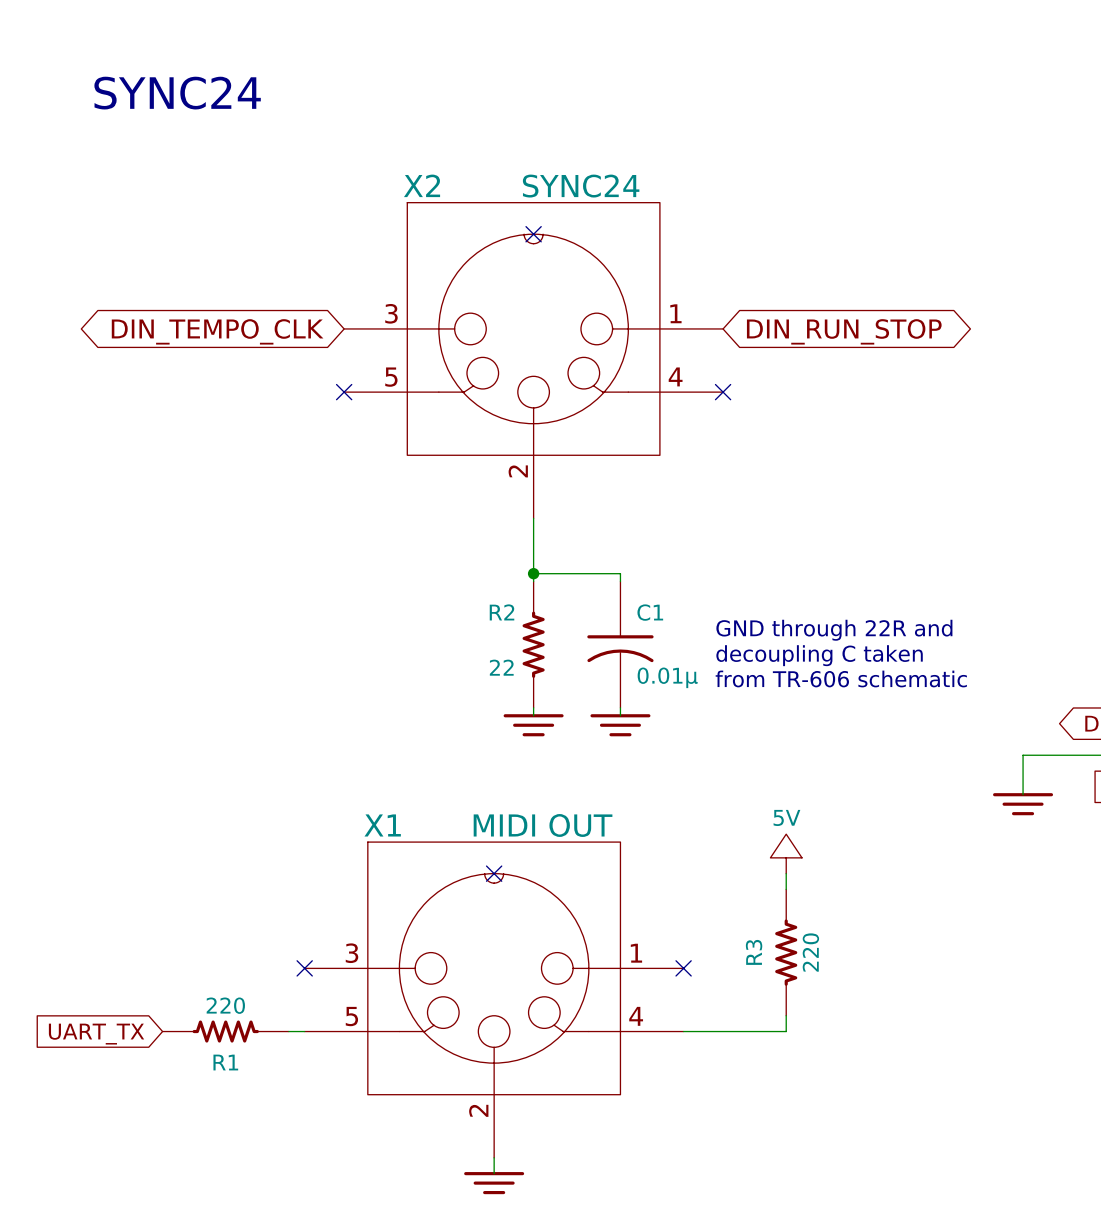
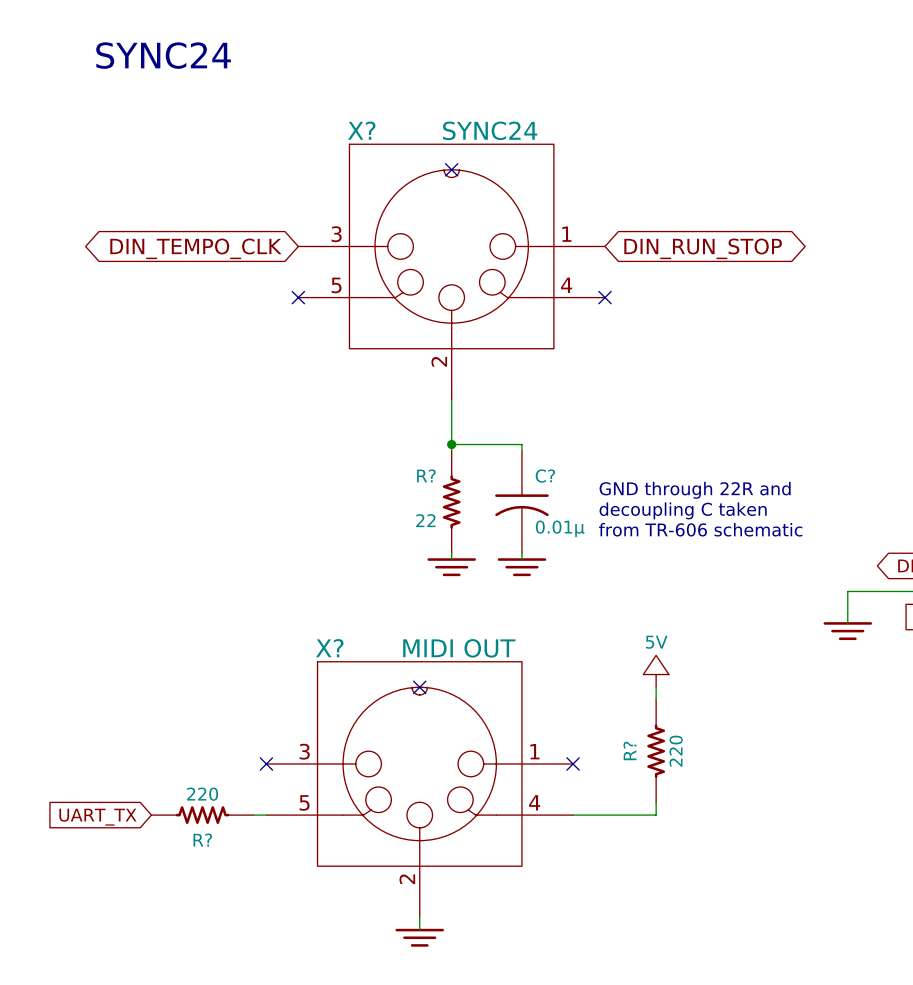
X2 name: X2 (422, 185) -> X? (361, 130)
R2 name: R2 (502, 612) -> R? (426, 475)
C1 name: C1 (650, 612) -> C? (545, 476)
X1 name: X1 (382, 825) -> X? (329, 648)
R3 name: R3 (754, 952) -> R? (629, 750)
R1 name: R1 (225, 1062) -> R? (202, 840)

